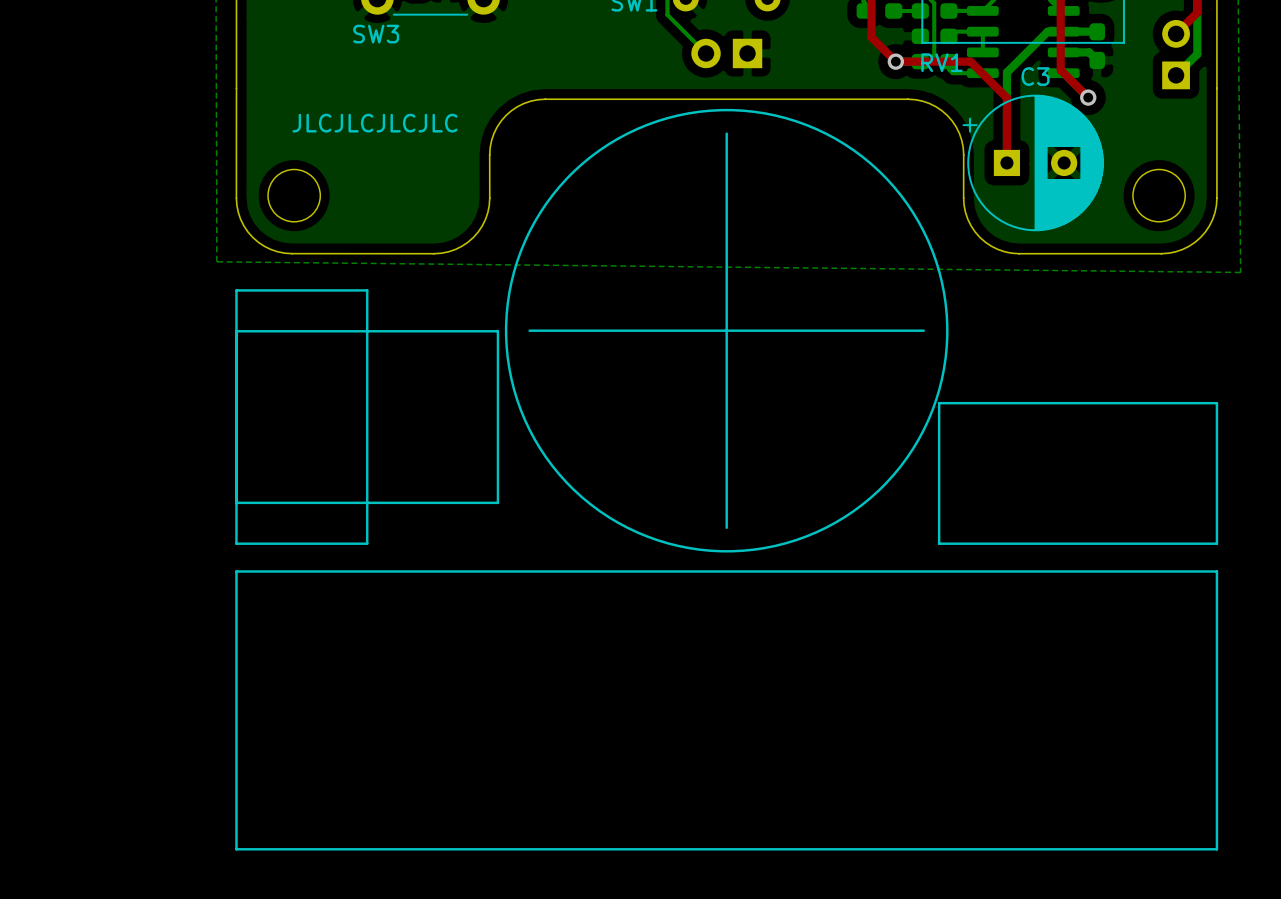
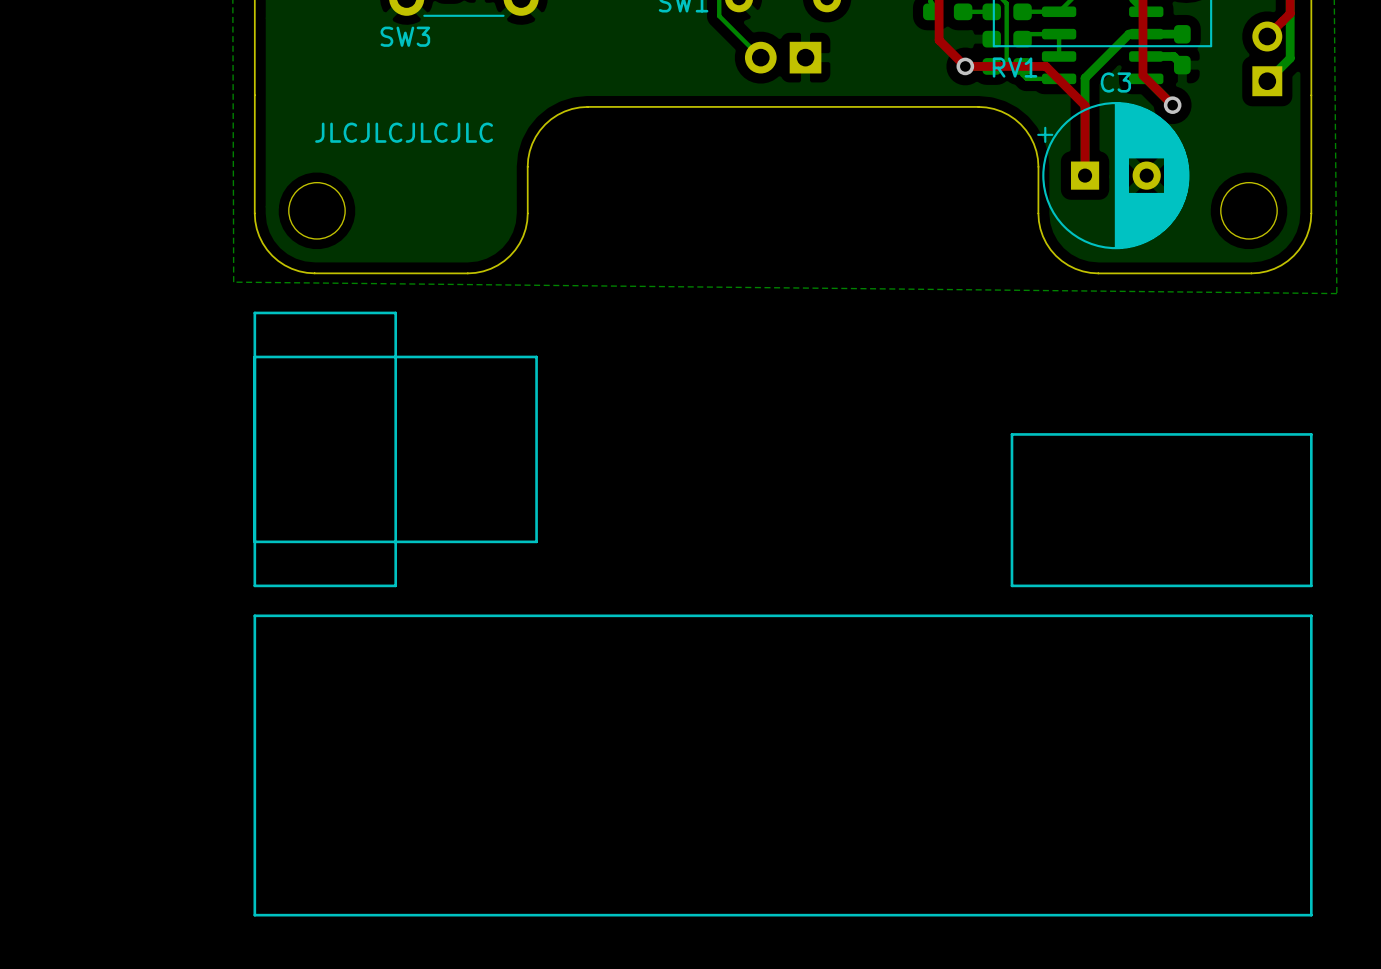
drawing: [504, 108, 949, 553] -> none
line: (726, 133) (726, 527) -> none
line: (529, 330) (923, 330) -> none

